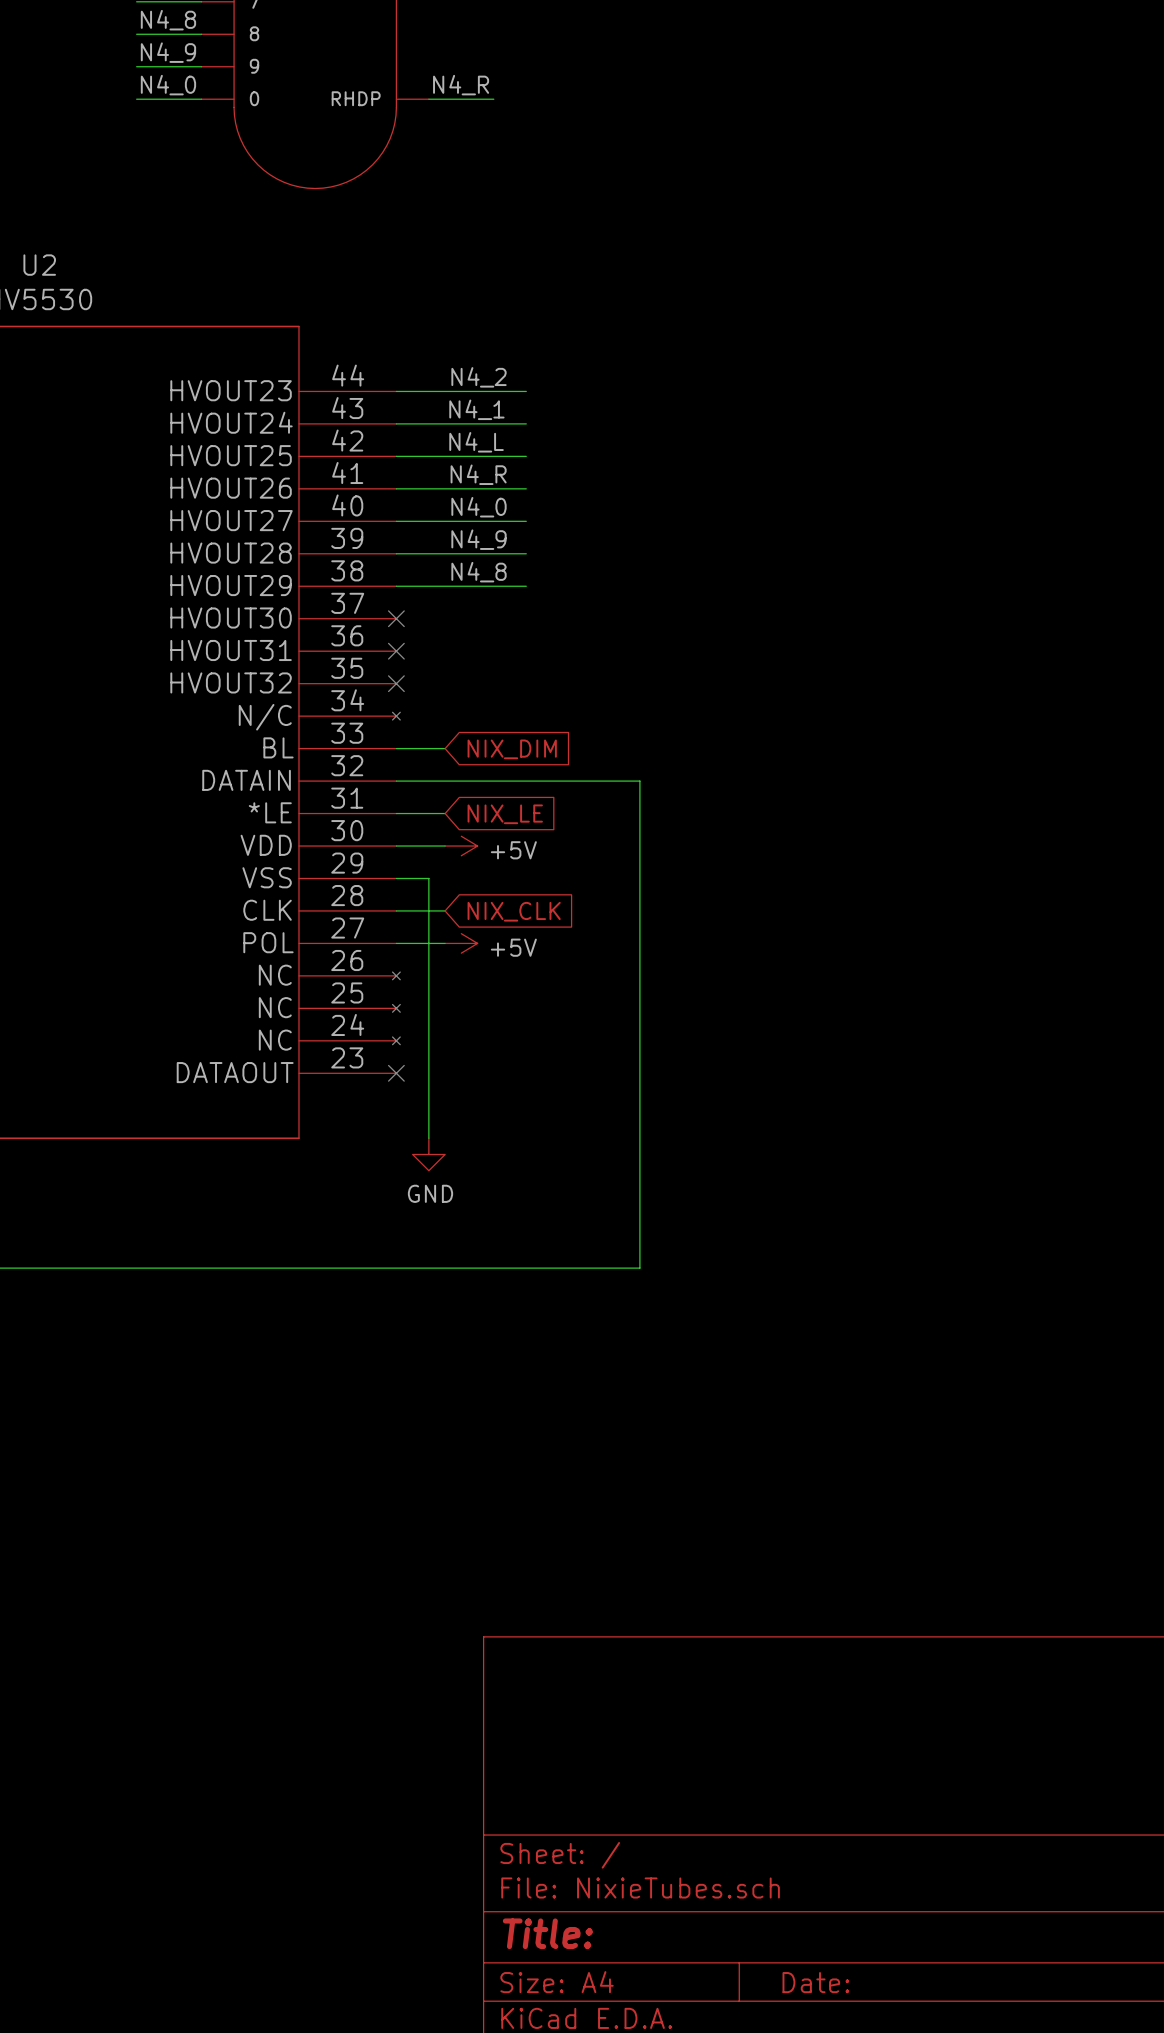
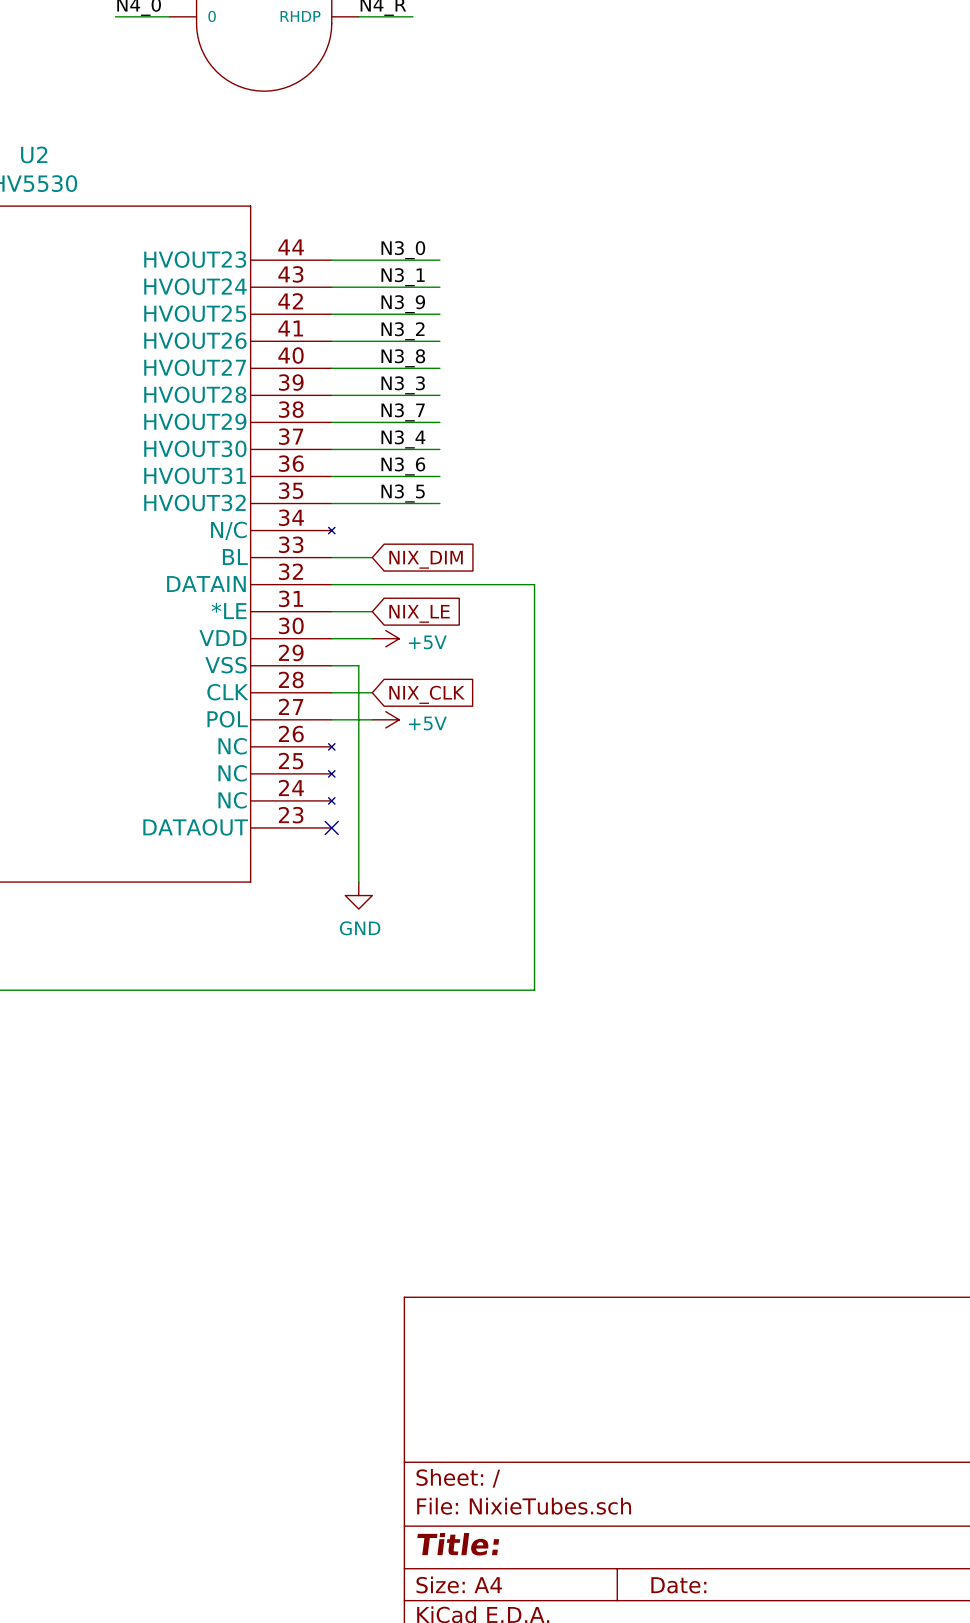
label: N4_2 (479, 377) -> N3_0 (403, 250)
label: N4_1 (476, 409) -> N3_1 (403, 277)
label: N4_L (476, 442) -> none
label: none -> N3_9 (403, 304)
label: N4_R (478, 474) -> N3_2 (403, 331)
label: N4_0 (479, 507) -> N3_8 (403, 358)
label: N4_9 (479, 539) -> N3_3 (403, 385)
label: N4_8 (479, 572) -> N3_7 (403, 412)
label: none -> N3_4 (403, 439)
wire: none -> (331, 449) (439, 449)
no-connect mark: (396, 618) -> none
label: none -> N3_6 (403, 466)
wire: none -> (331, 476) (439, 476)
no-connect mark: (396, 651) -> none
label: none -> N3_5 (403, 493)
wire: none -> (331, 503) (439, 503)
no-connect mark: (396, 683) -> none

